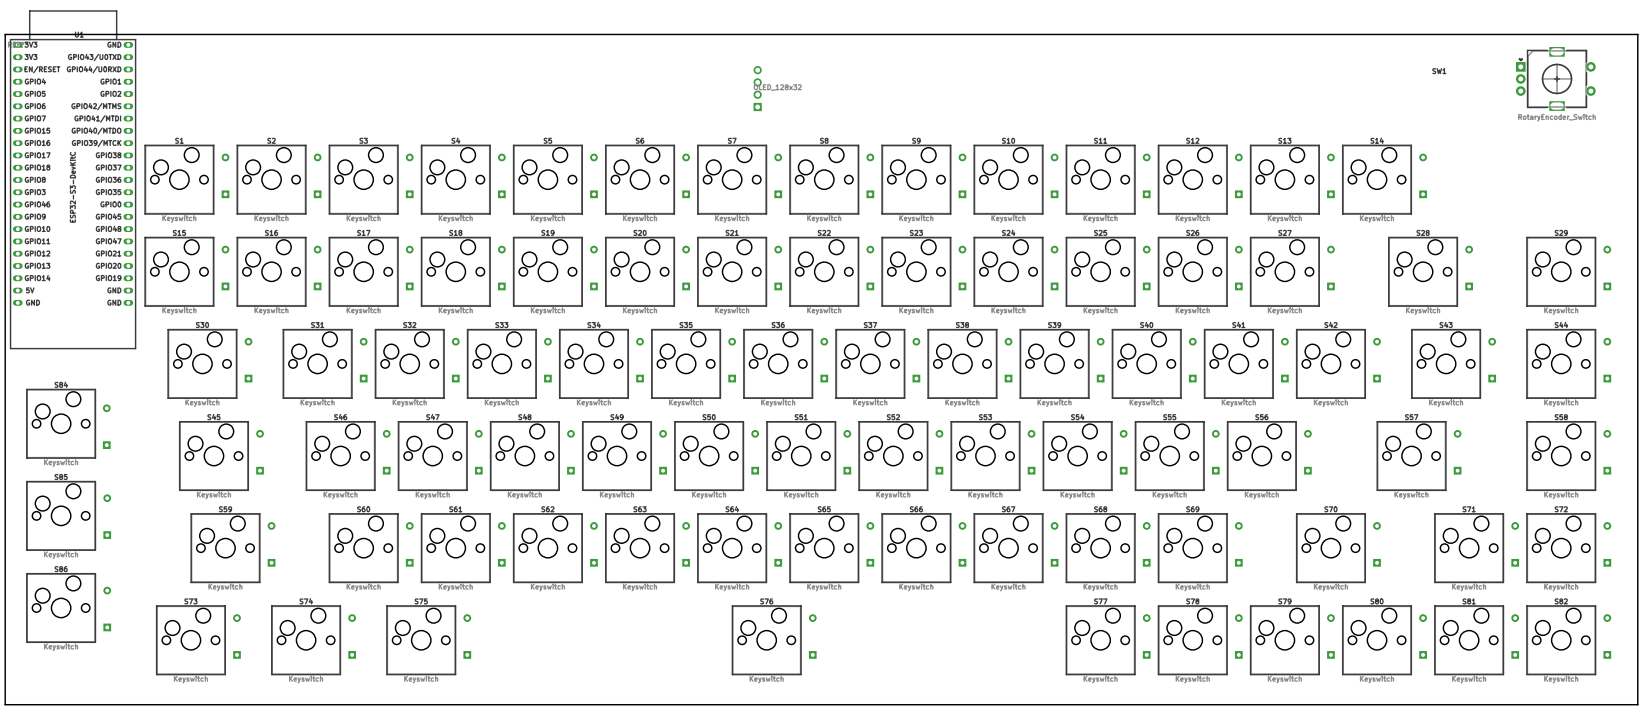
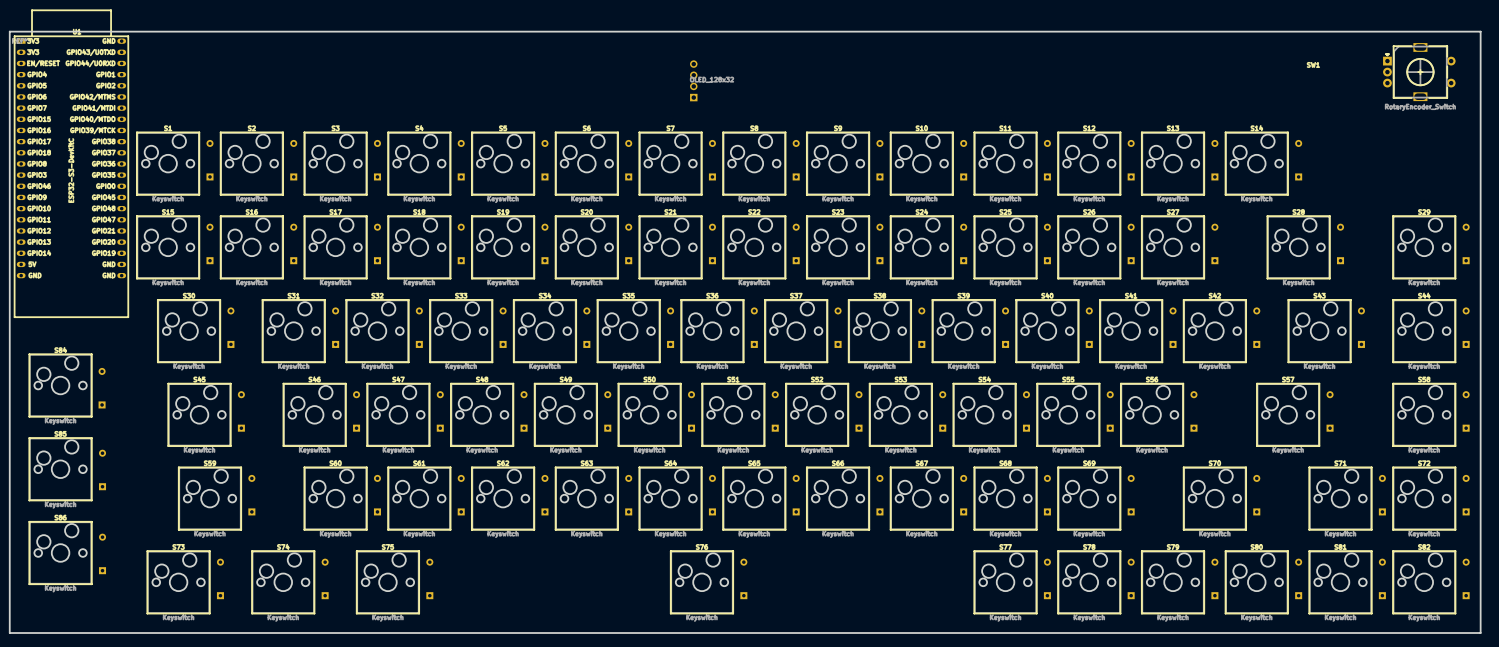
board edge: (1623, 34) (1637, 34) (1637, 704) (5, 704) (5, 696) -> (1480, 31) (1480, 633) (9, 633)

